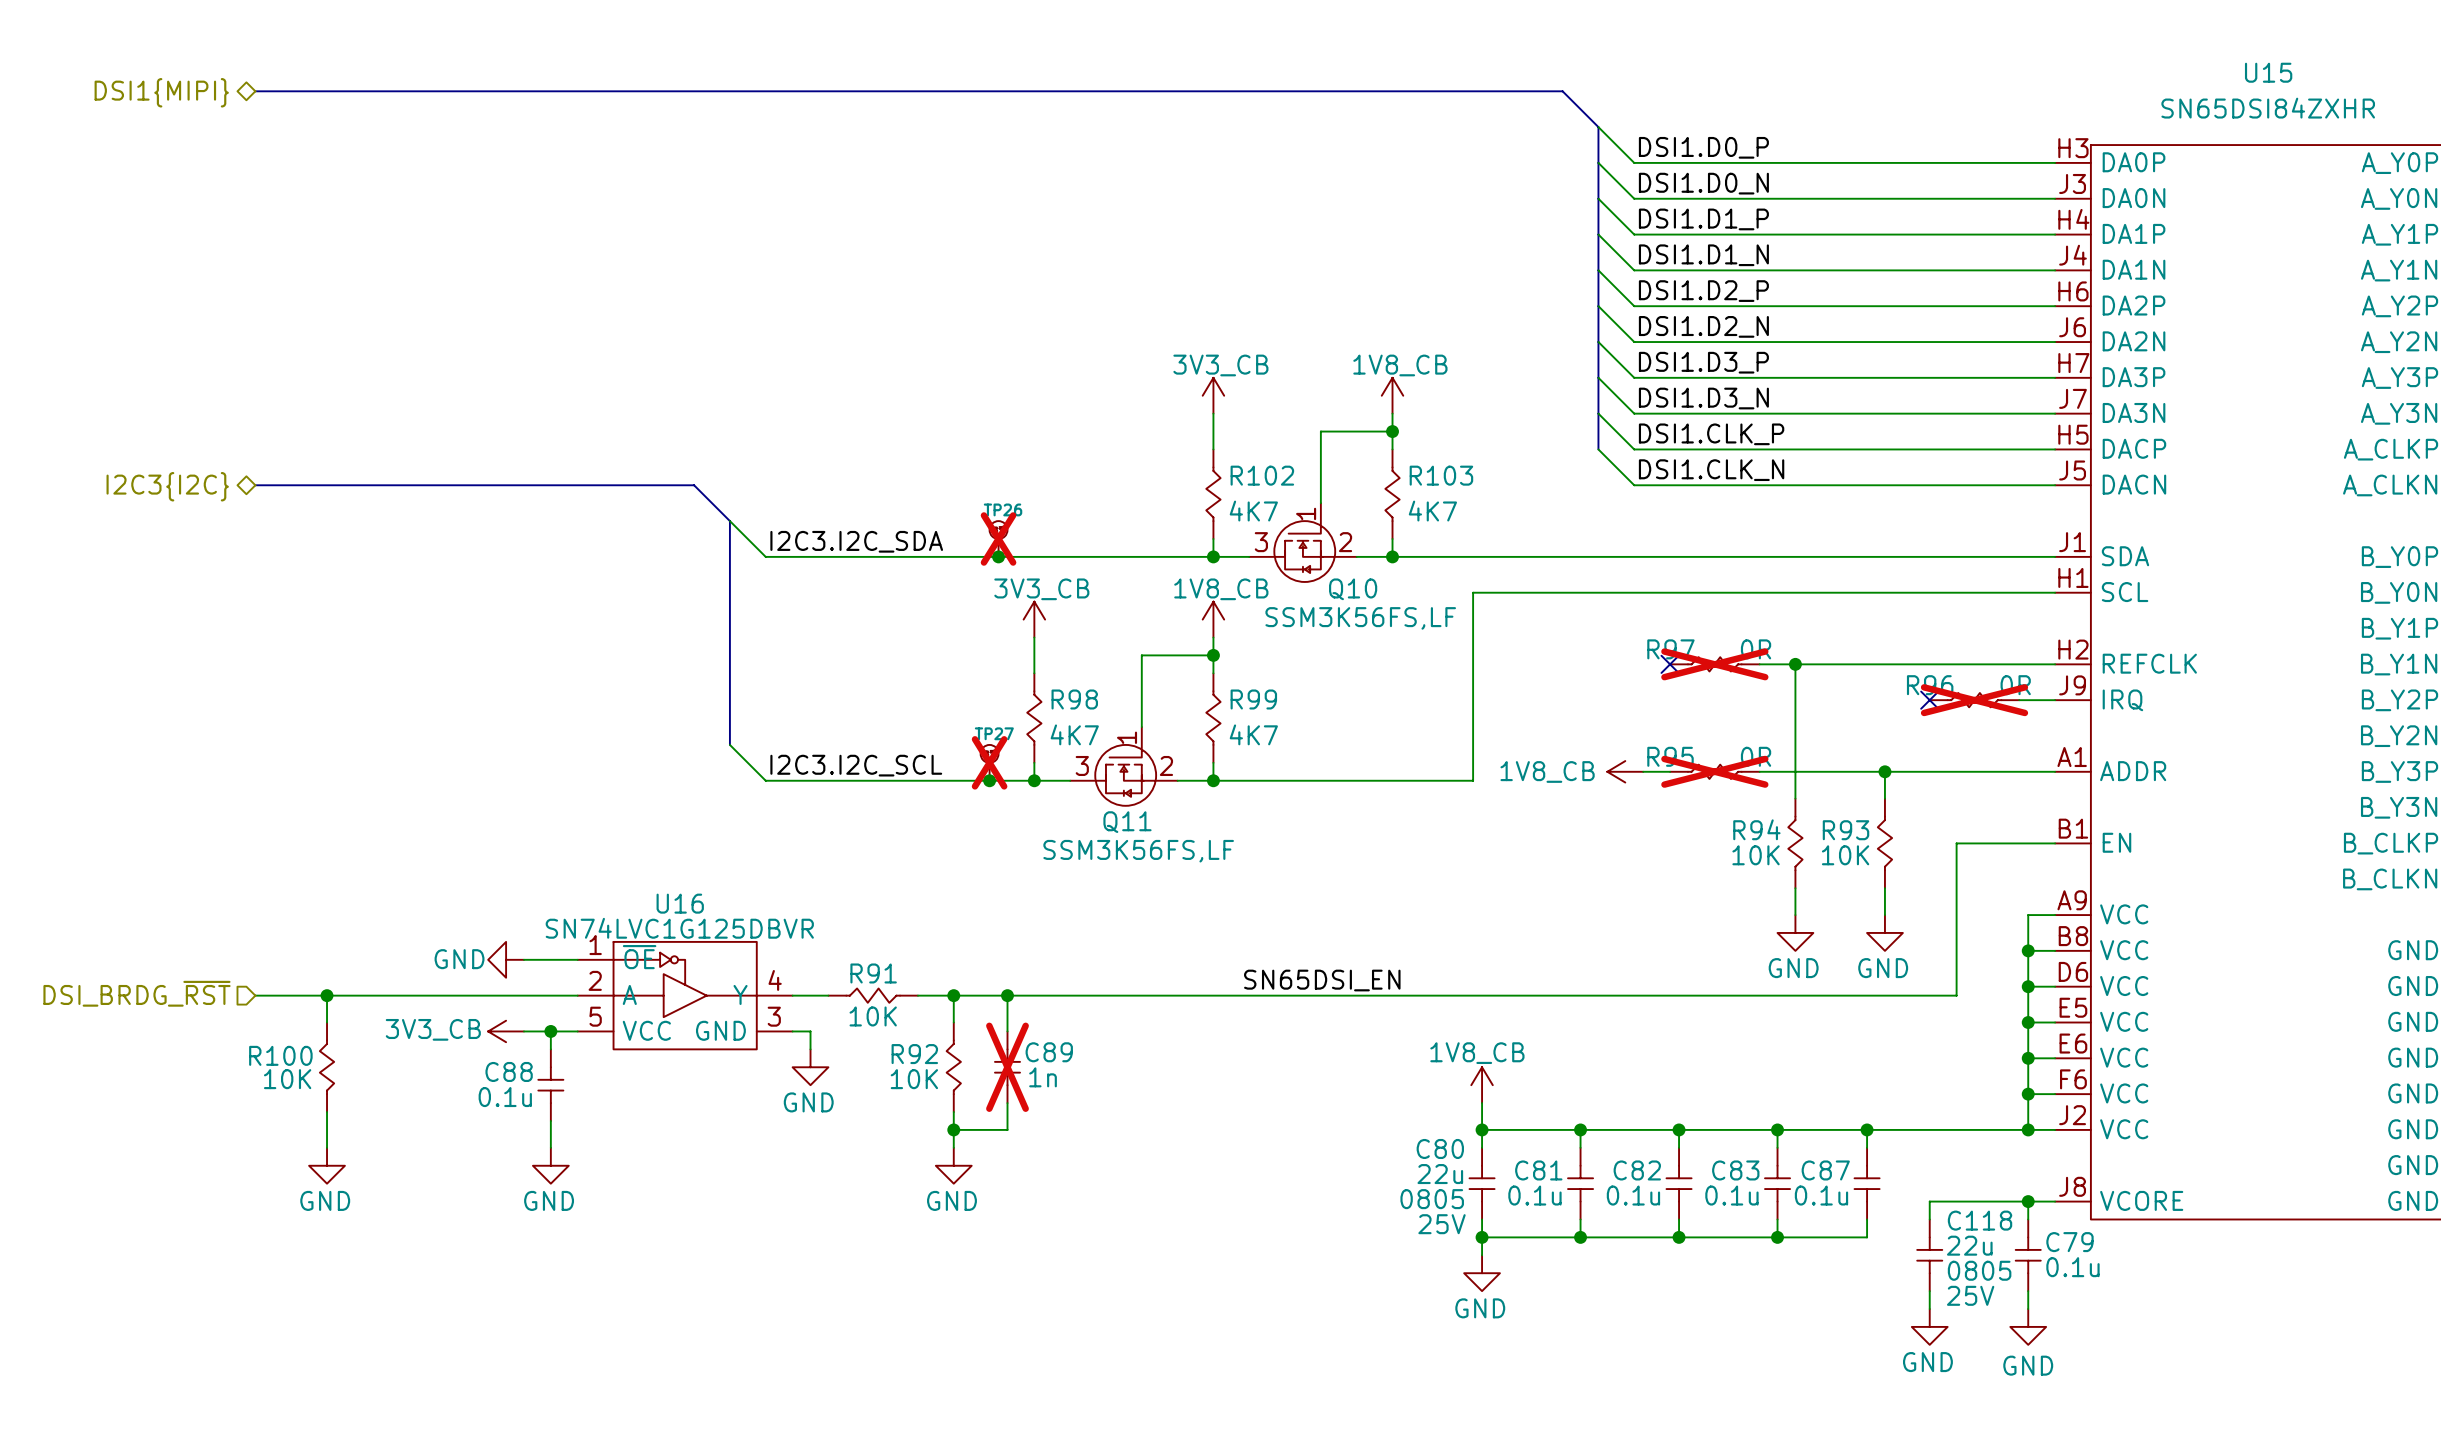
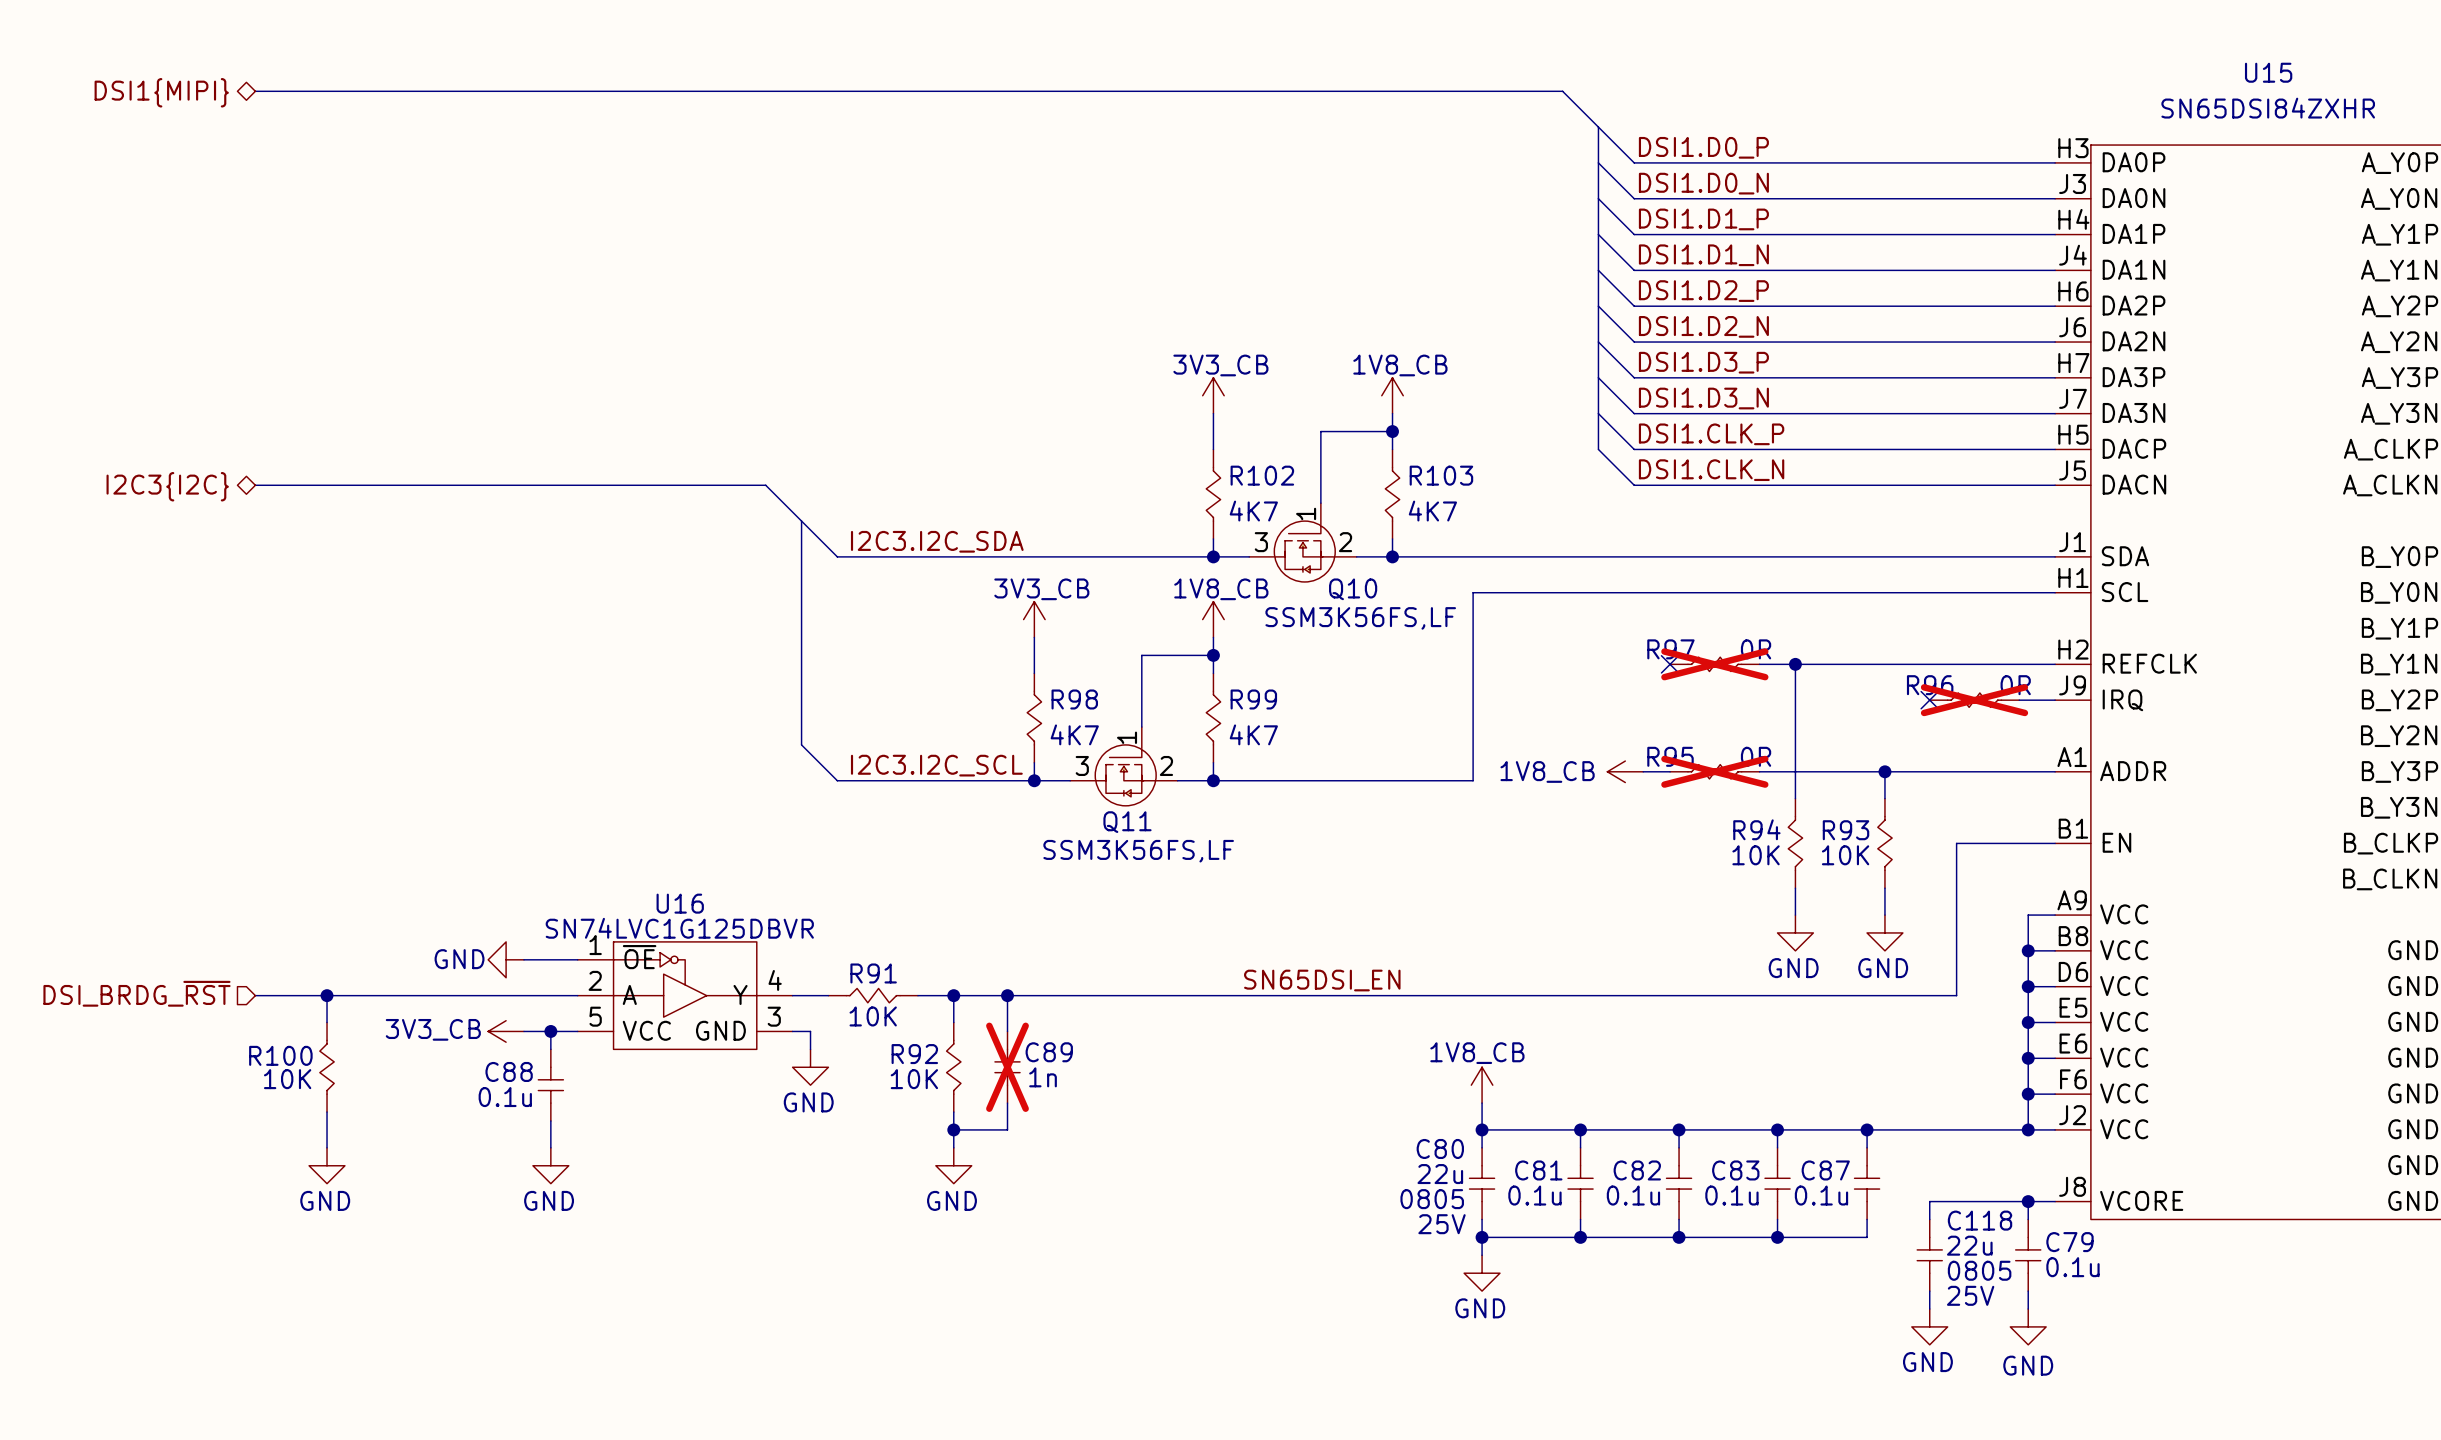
bus: (694, 485) (729, 521) (729, 744) -> (694, 485) (765, 485) (801, 521) (801, 744)
wire: (729, 521) (765, 556) (837, 556) -> (801, 521) (837, 556)
TP26: (998, 539) -> none
label position: I2C3.I2C_SDA (856, 541) -> I2C3.I2C_SDA (937, 541)
junction: (998, 556) -> none
wire: (729, 744) (765, 780) (837, 780) -> (801, 744) (837, 780)
TP27: (989, 762) -> none
label position: I2C3.I2C_SCL (856, 765) -> I2C3.I2C_SCL (936, 765)
junction: (989, 780) -> none

